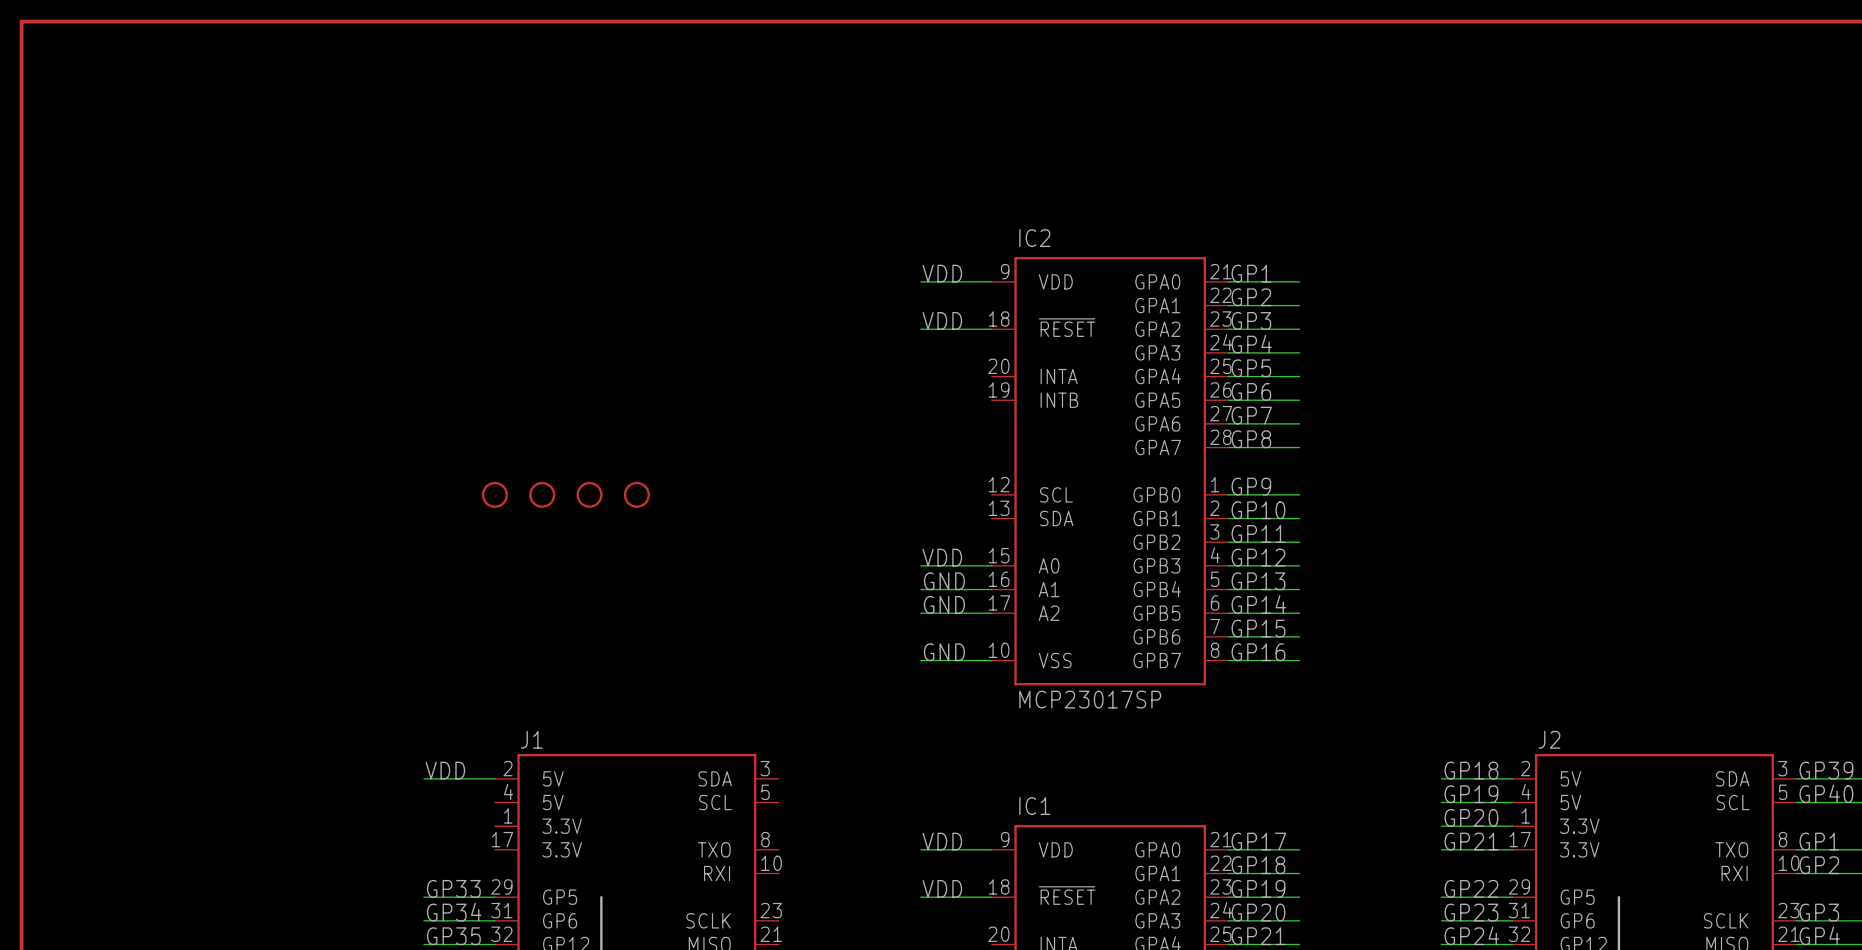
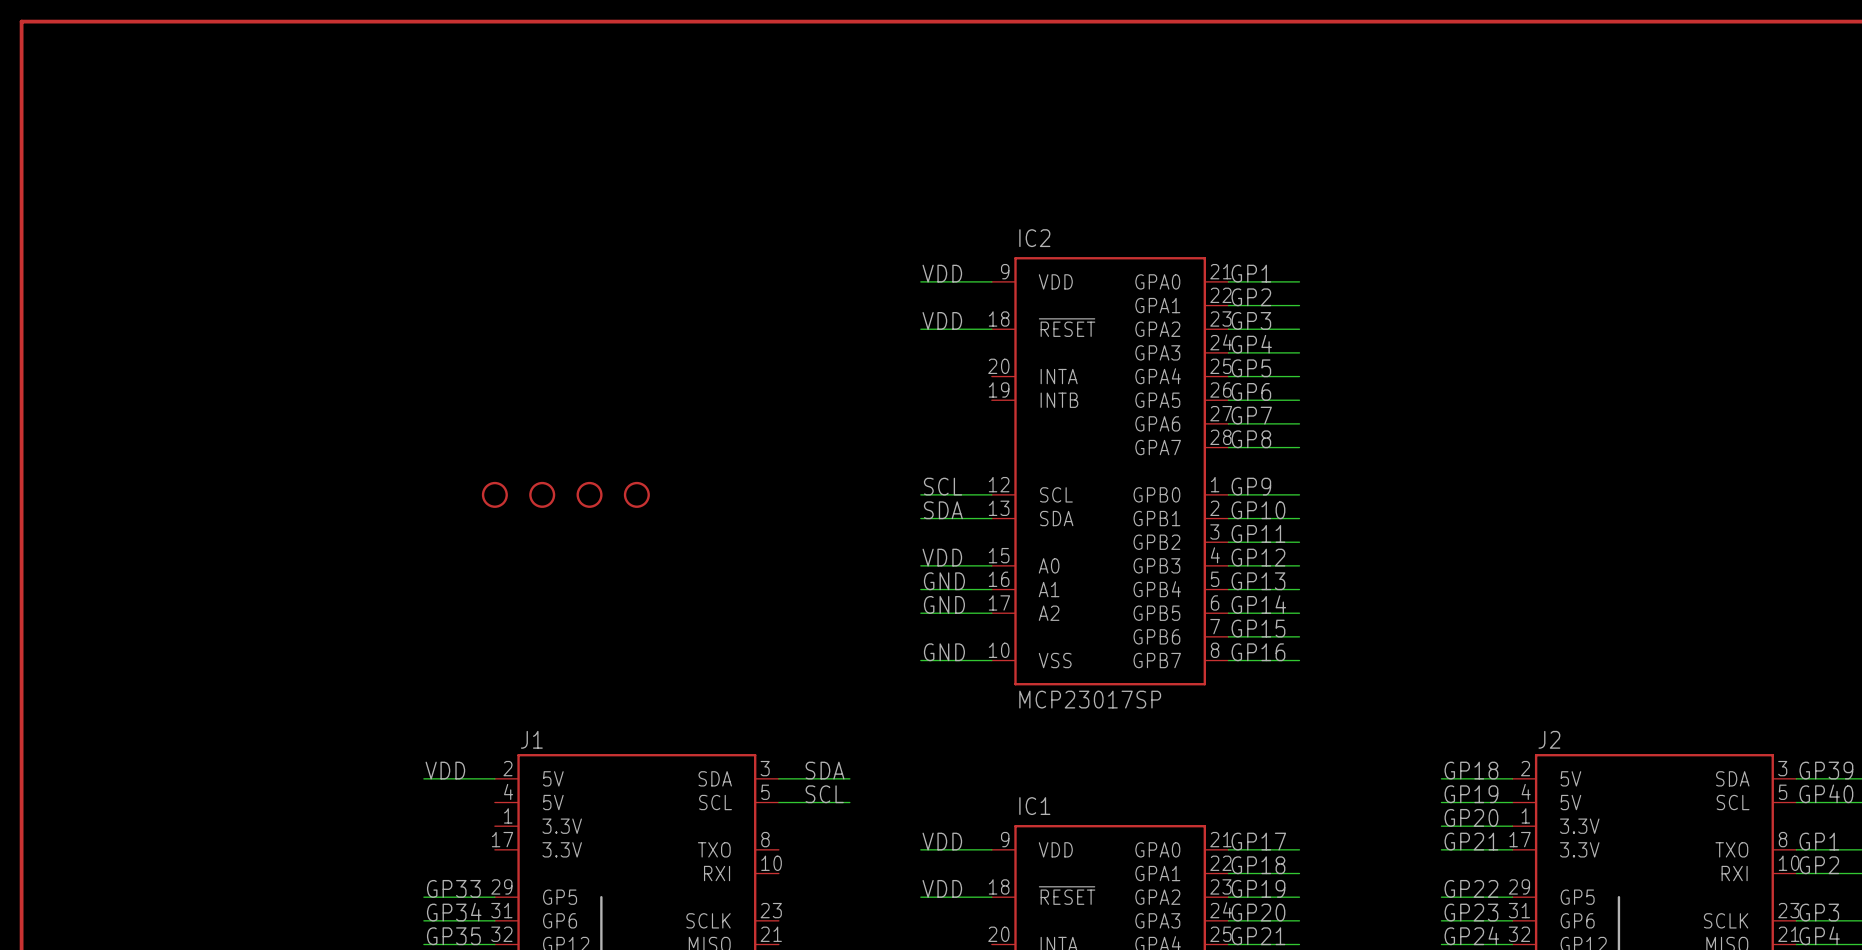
label: none -> SCL (943, 486)
wire: none -> (920, 494) (991, 494)
label: none -> SDA (943, 510)
wire: none -> (920, 518) (991, 518)
label: none -> SDA (825, 770)
wire: none -> (778, 778) (849, 778)
label: none -> SCL (824, 794)
wire: none -> (778, 802) (849, 802)

